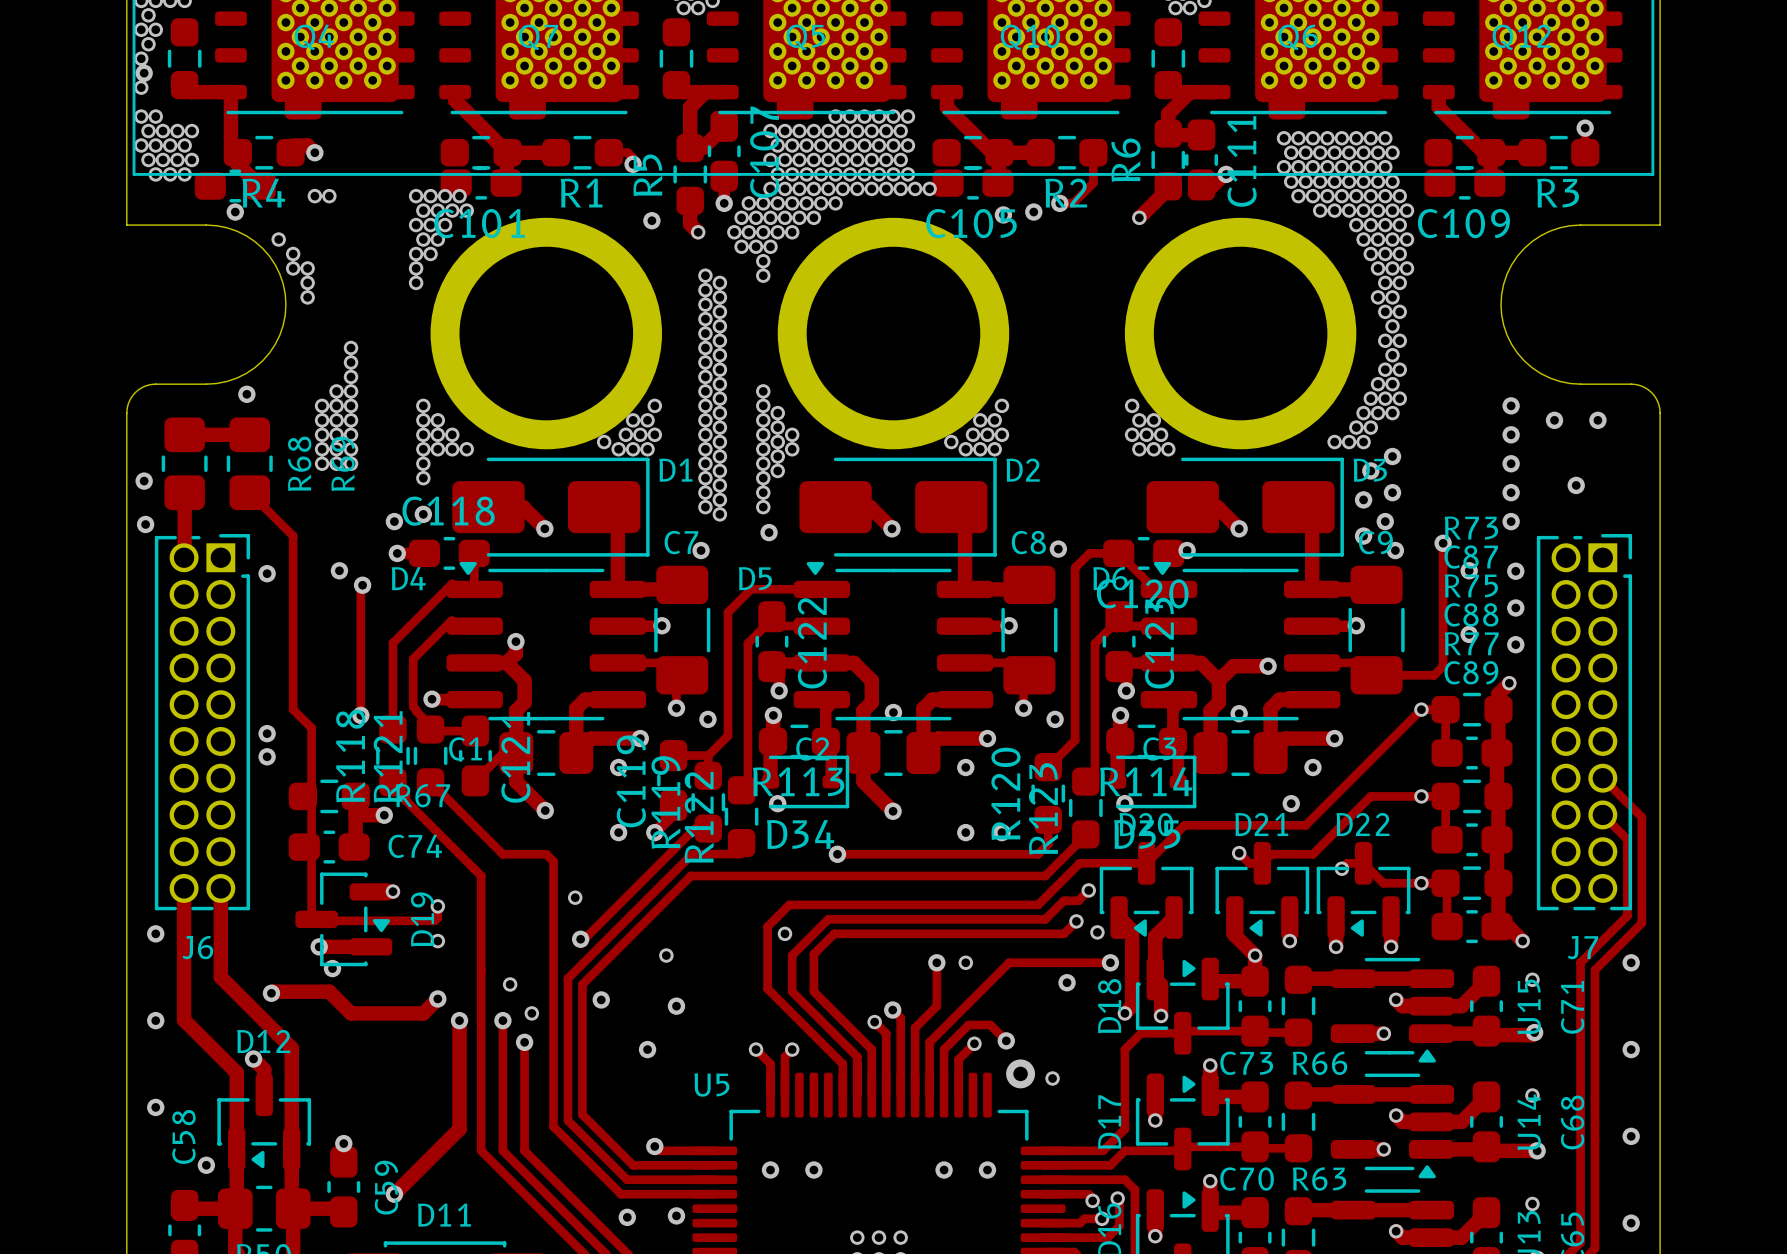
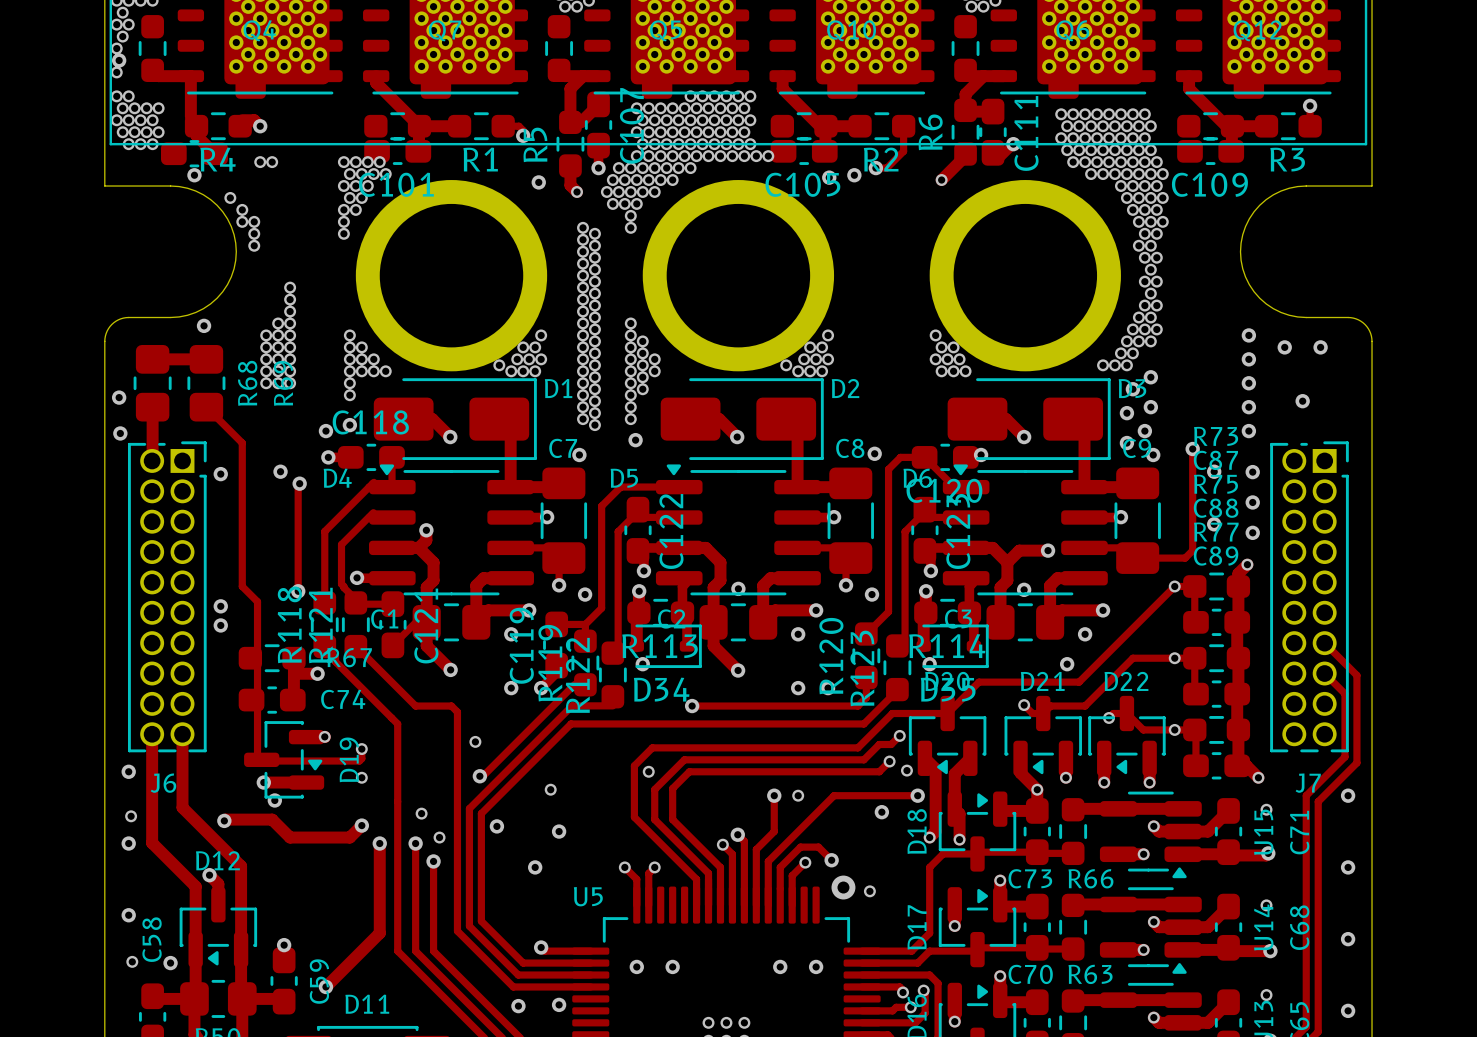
via: none -> (131, 816)
via: none -> (132, 961)

